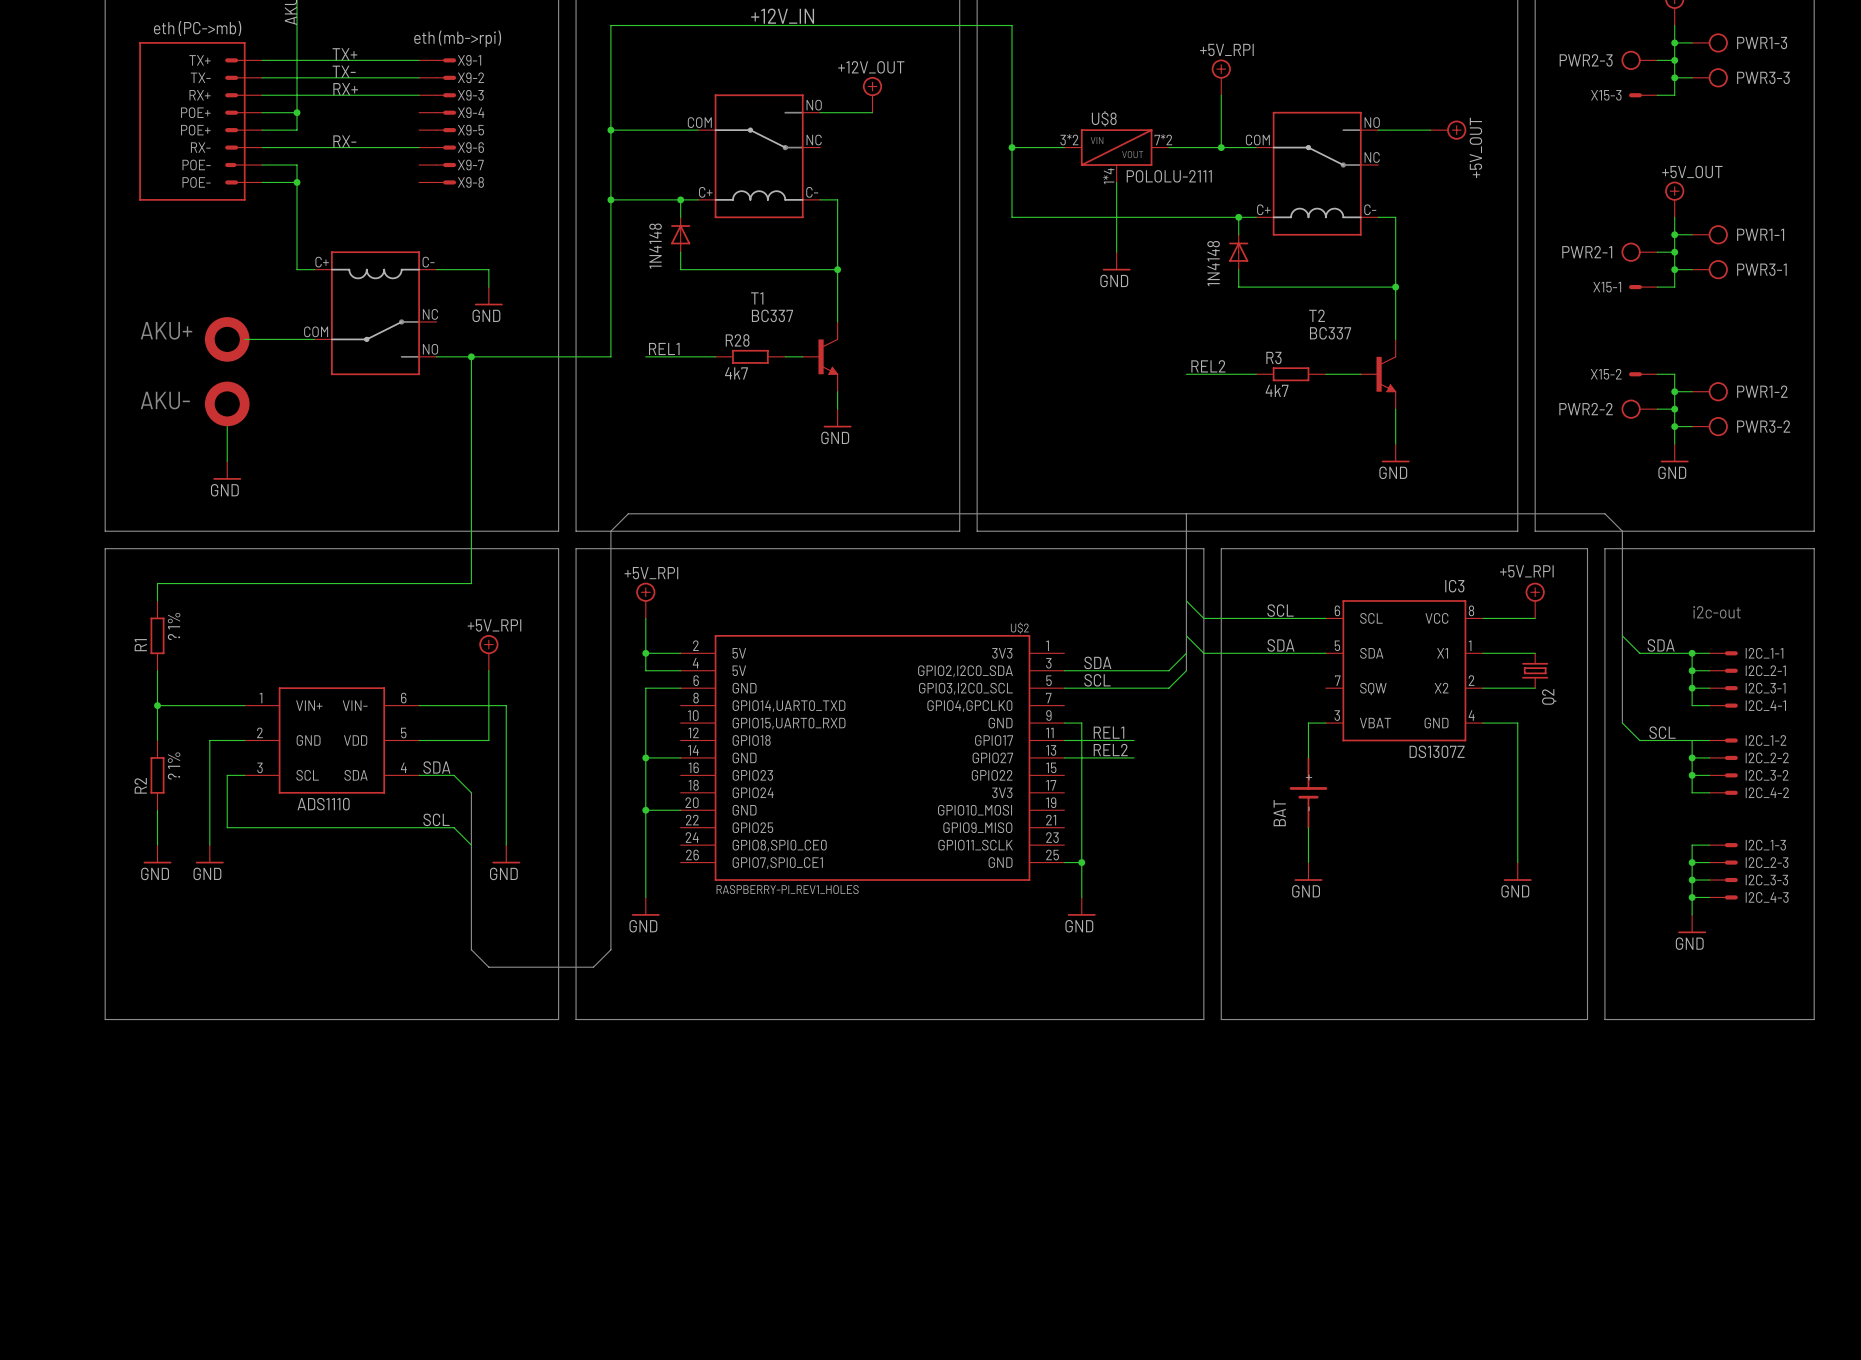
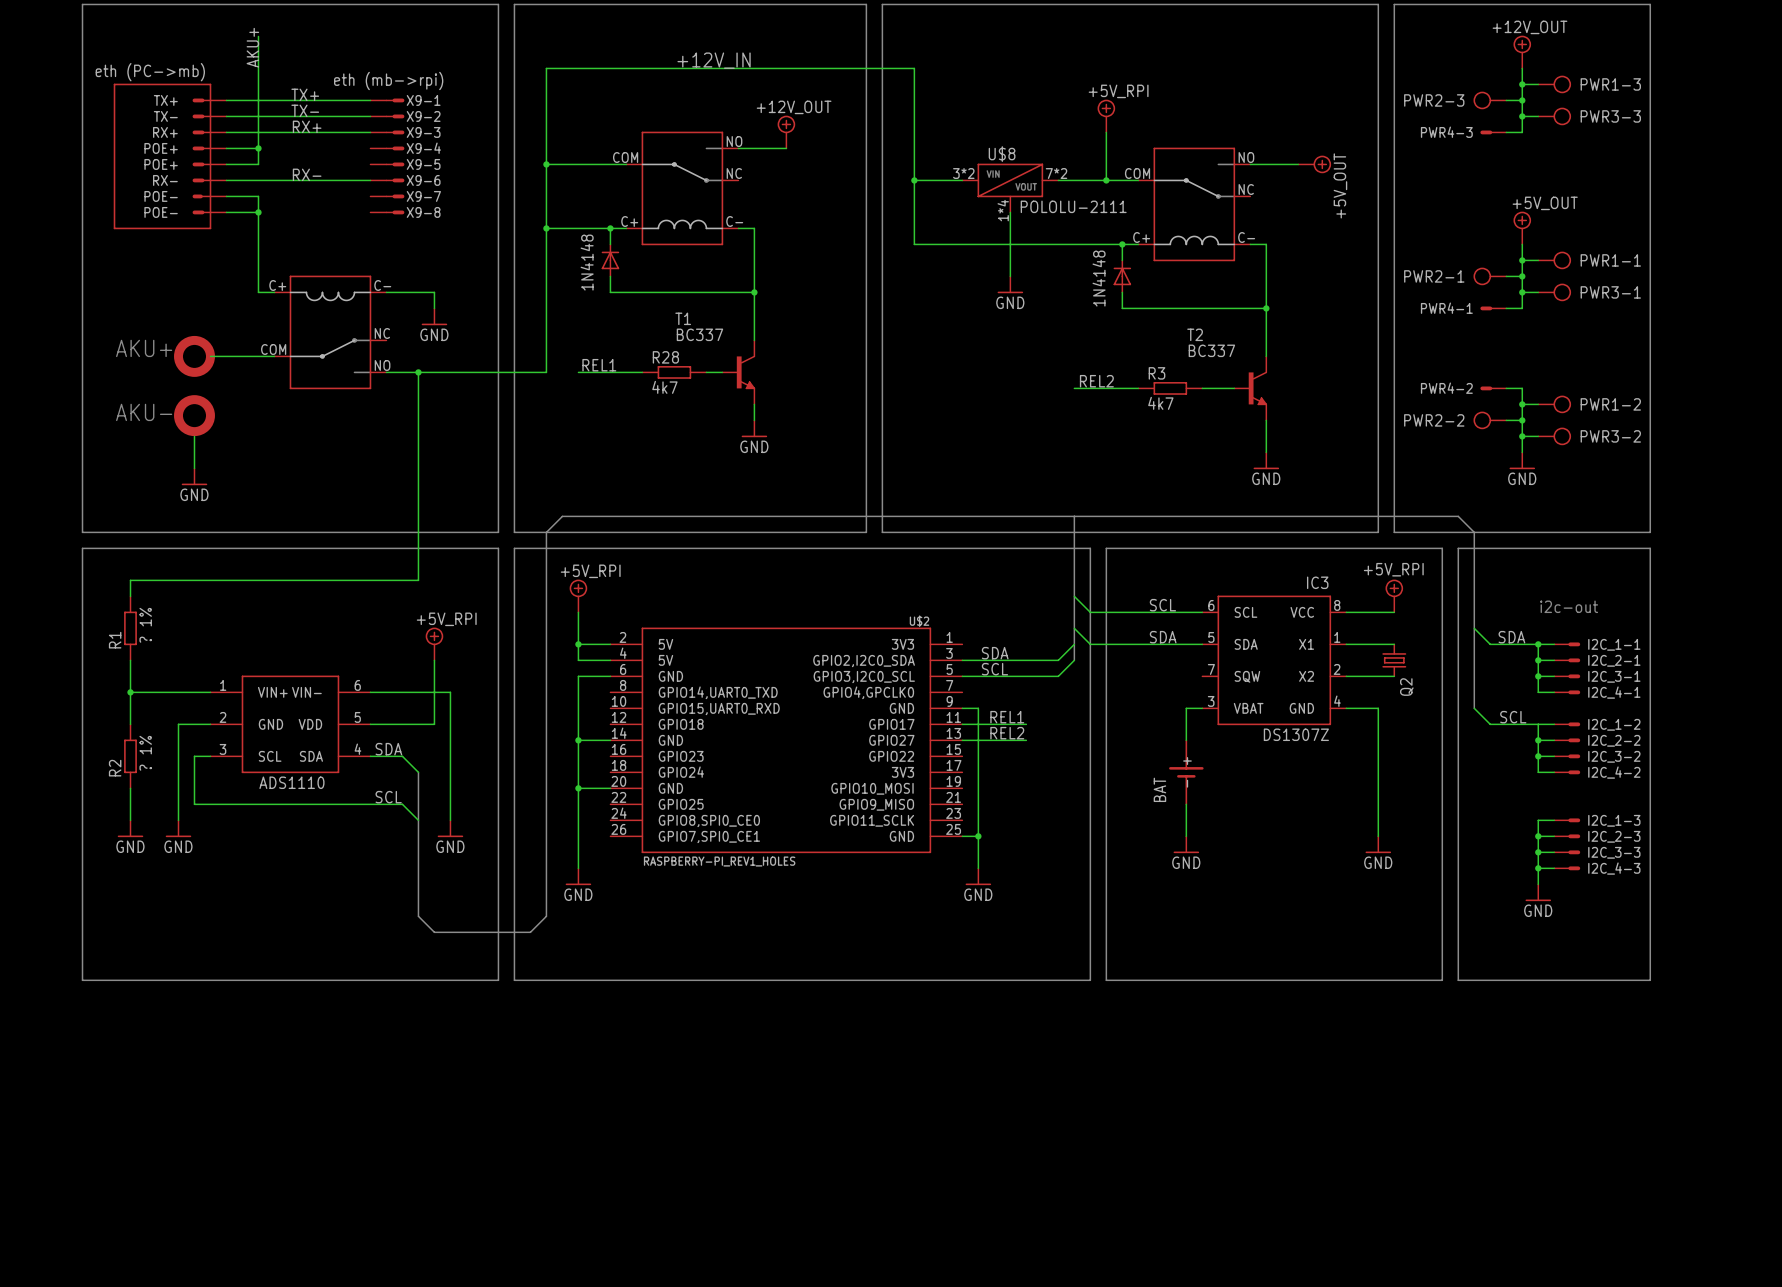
X15-3 name: X15-3 (1606, 95) -> PWR4-3 (1446, 132)
X15-1 name: X15-1 (1607, 287) -> PWR4-1 (1446, 308)
X15-2 name: X15-2 (1606, 374) -> PWR4-2 (1446, 388)

